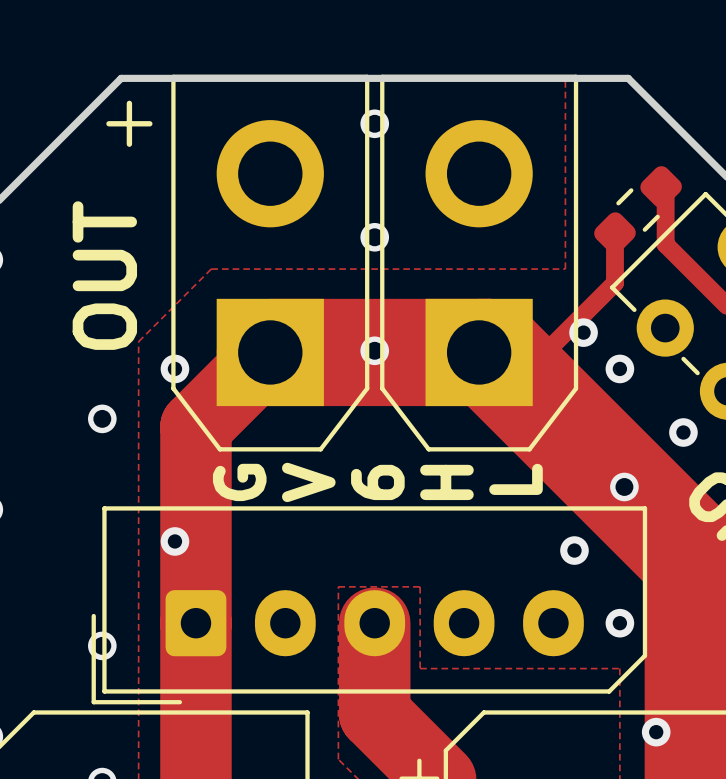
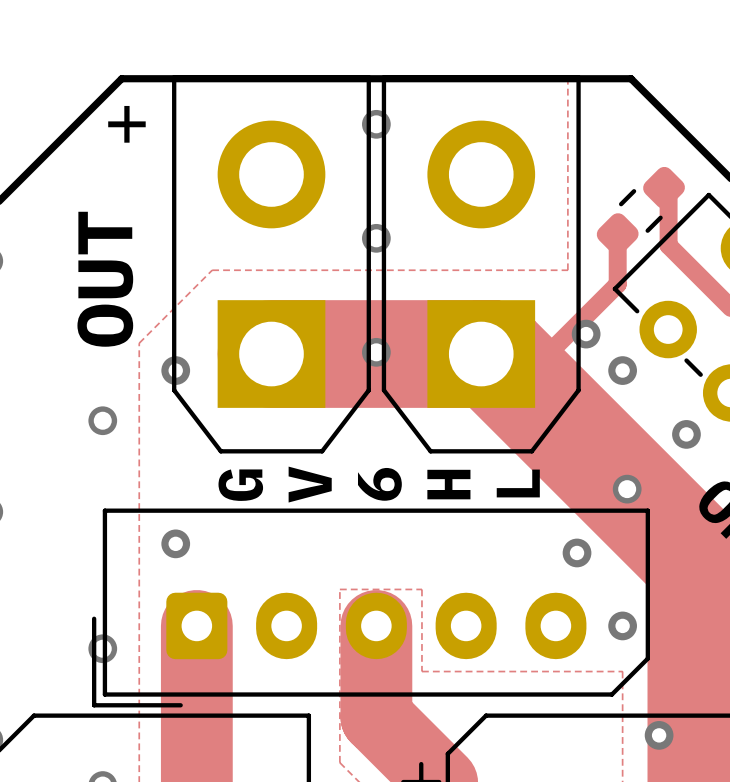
track: (270, 352) (195, 426) (195, 623) -> none

